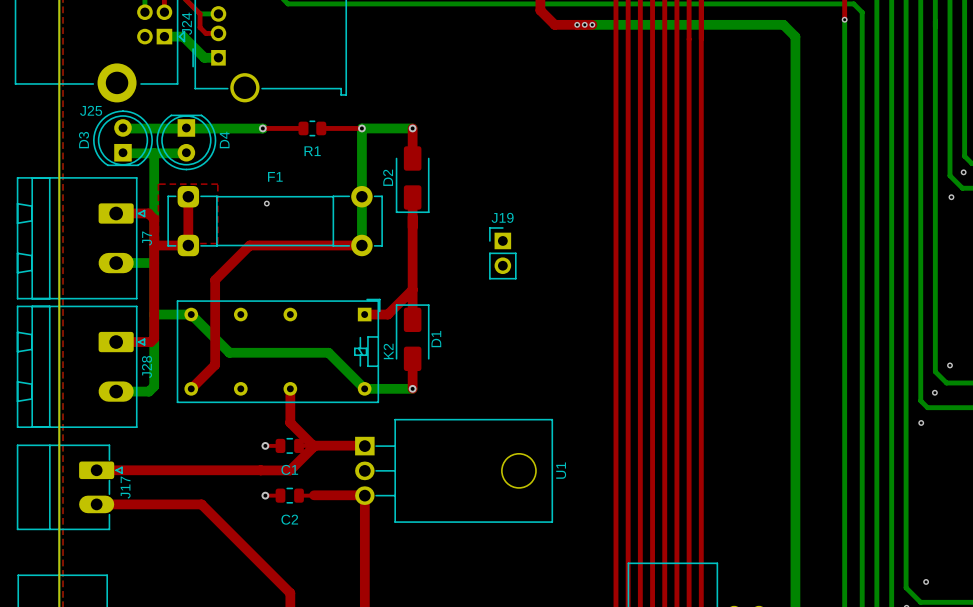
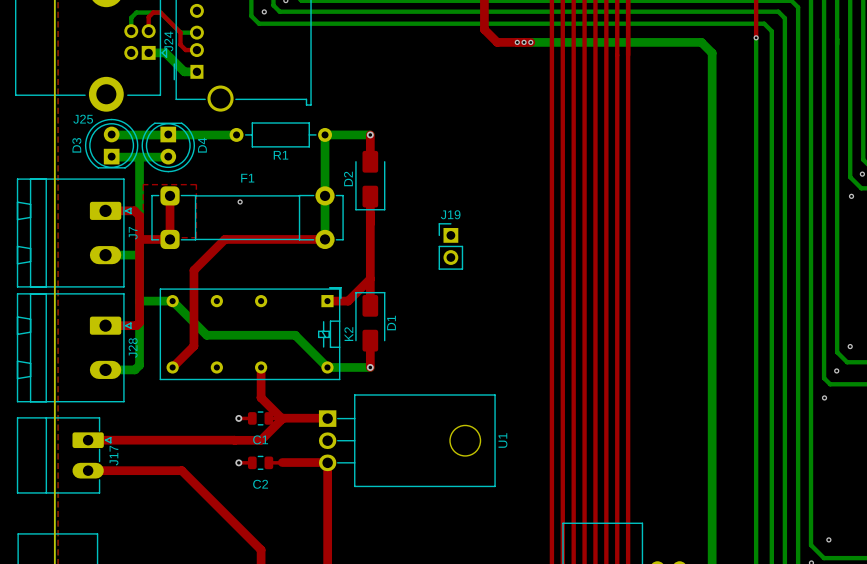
R1 footprint: [298, 120, 327, 137] -> [229, 122, 333, 148]
top track: (262, 128) (303, 128) -> none
via: (262, 128) -> none
top track: (321, 128) (361, 128) -> none
via: (361, 128) -> none

